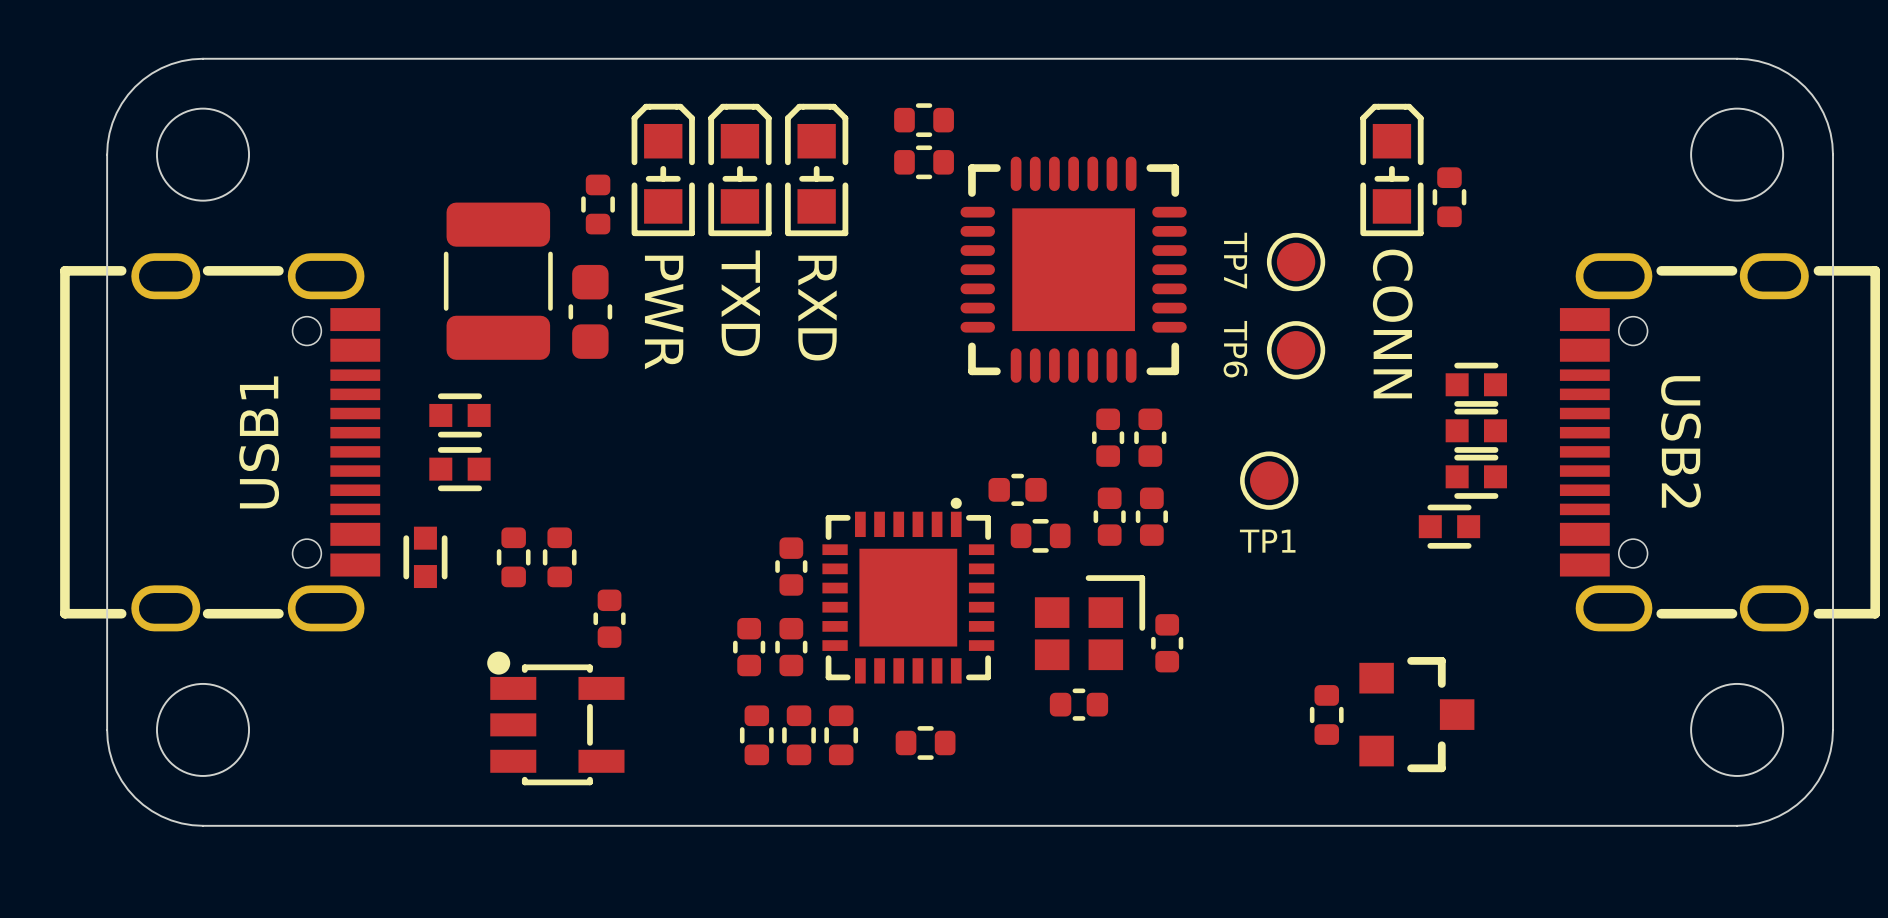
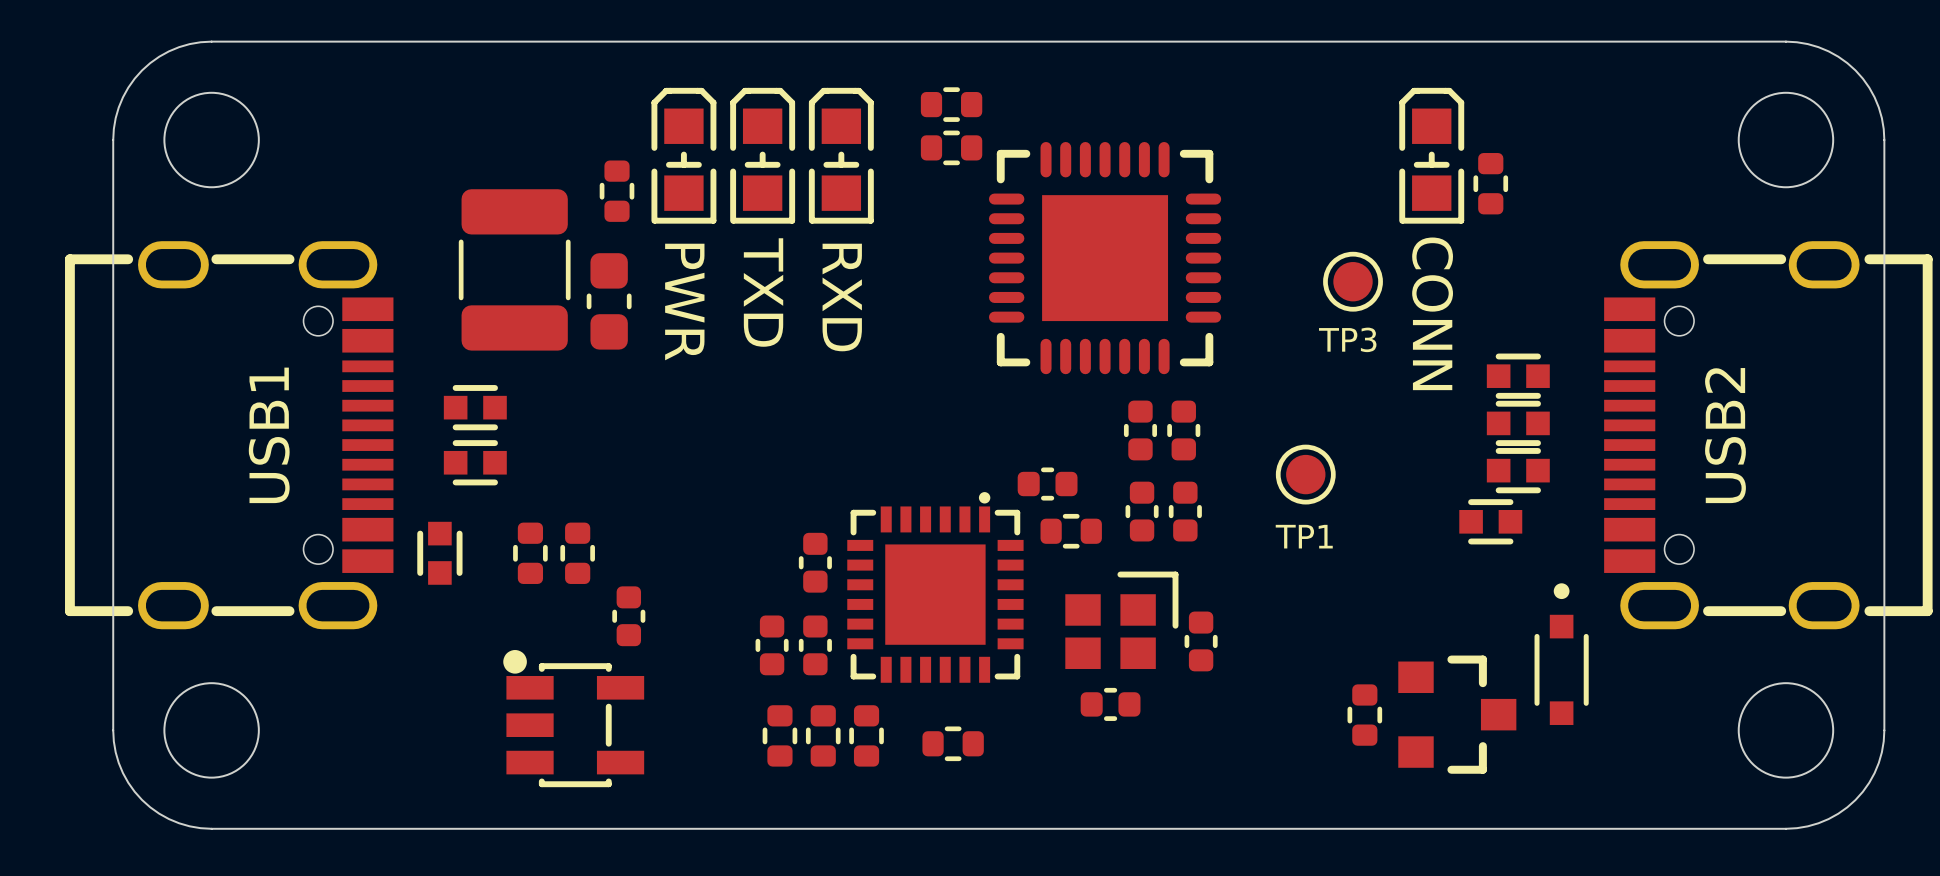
TP7: (1296, 262) -> none
TP3: none -> (1353, 281)
TP6: (1296, 350) -> none
USB2 name rotation: 0° (1681, 441) -> 180° (1725, 435)
part: none -> (1561, 654)

